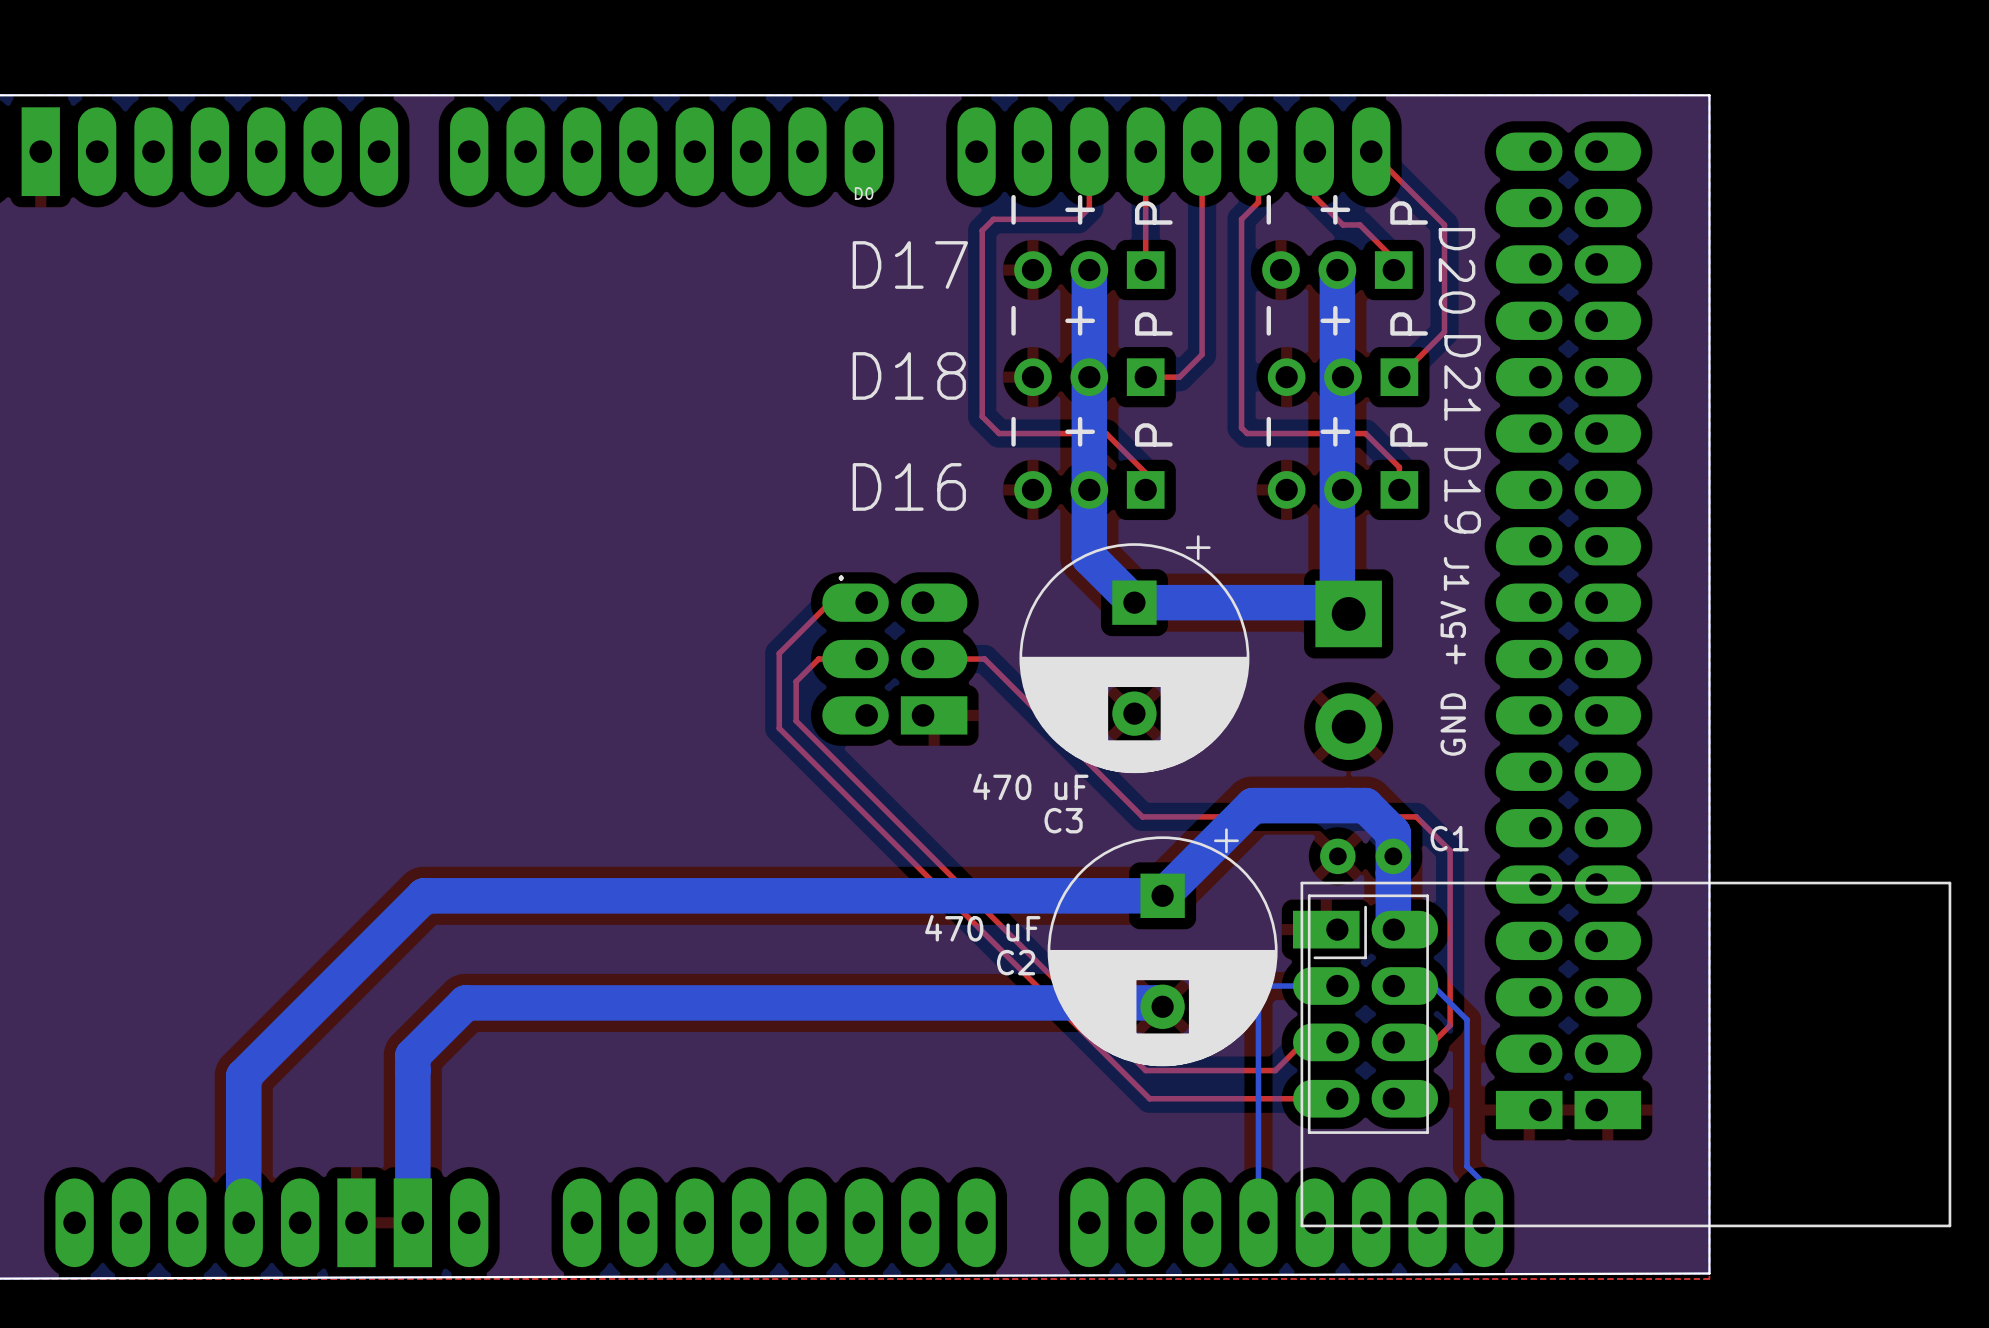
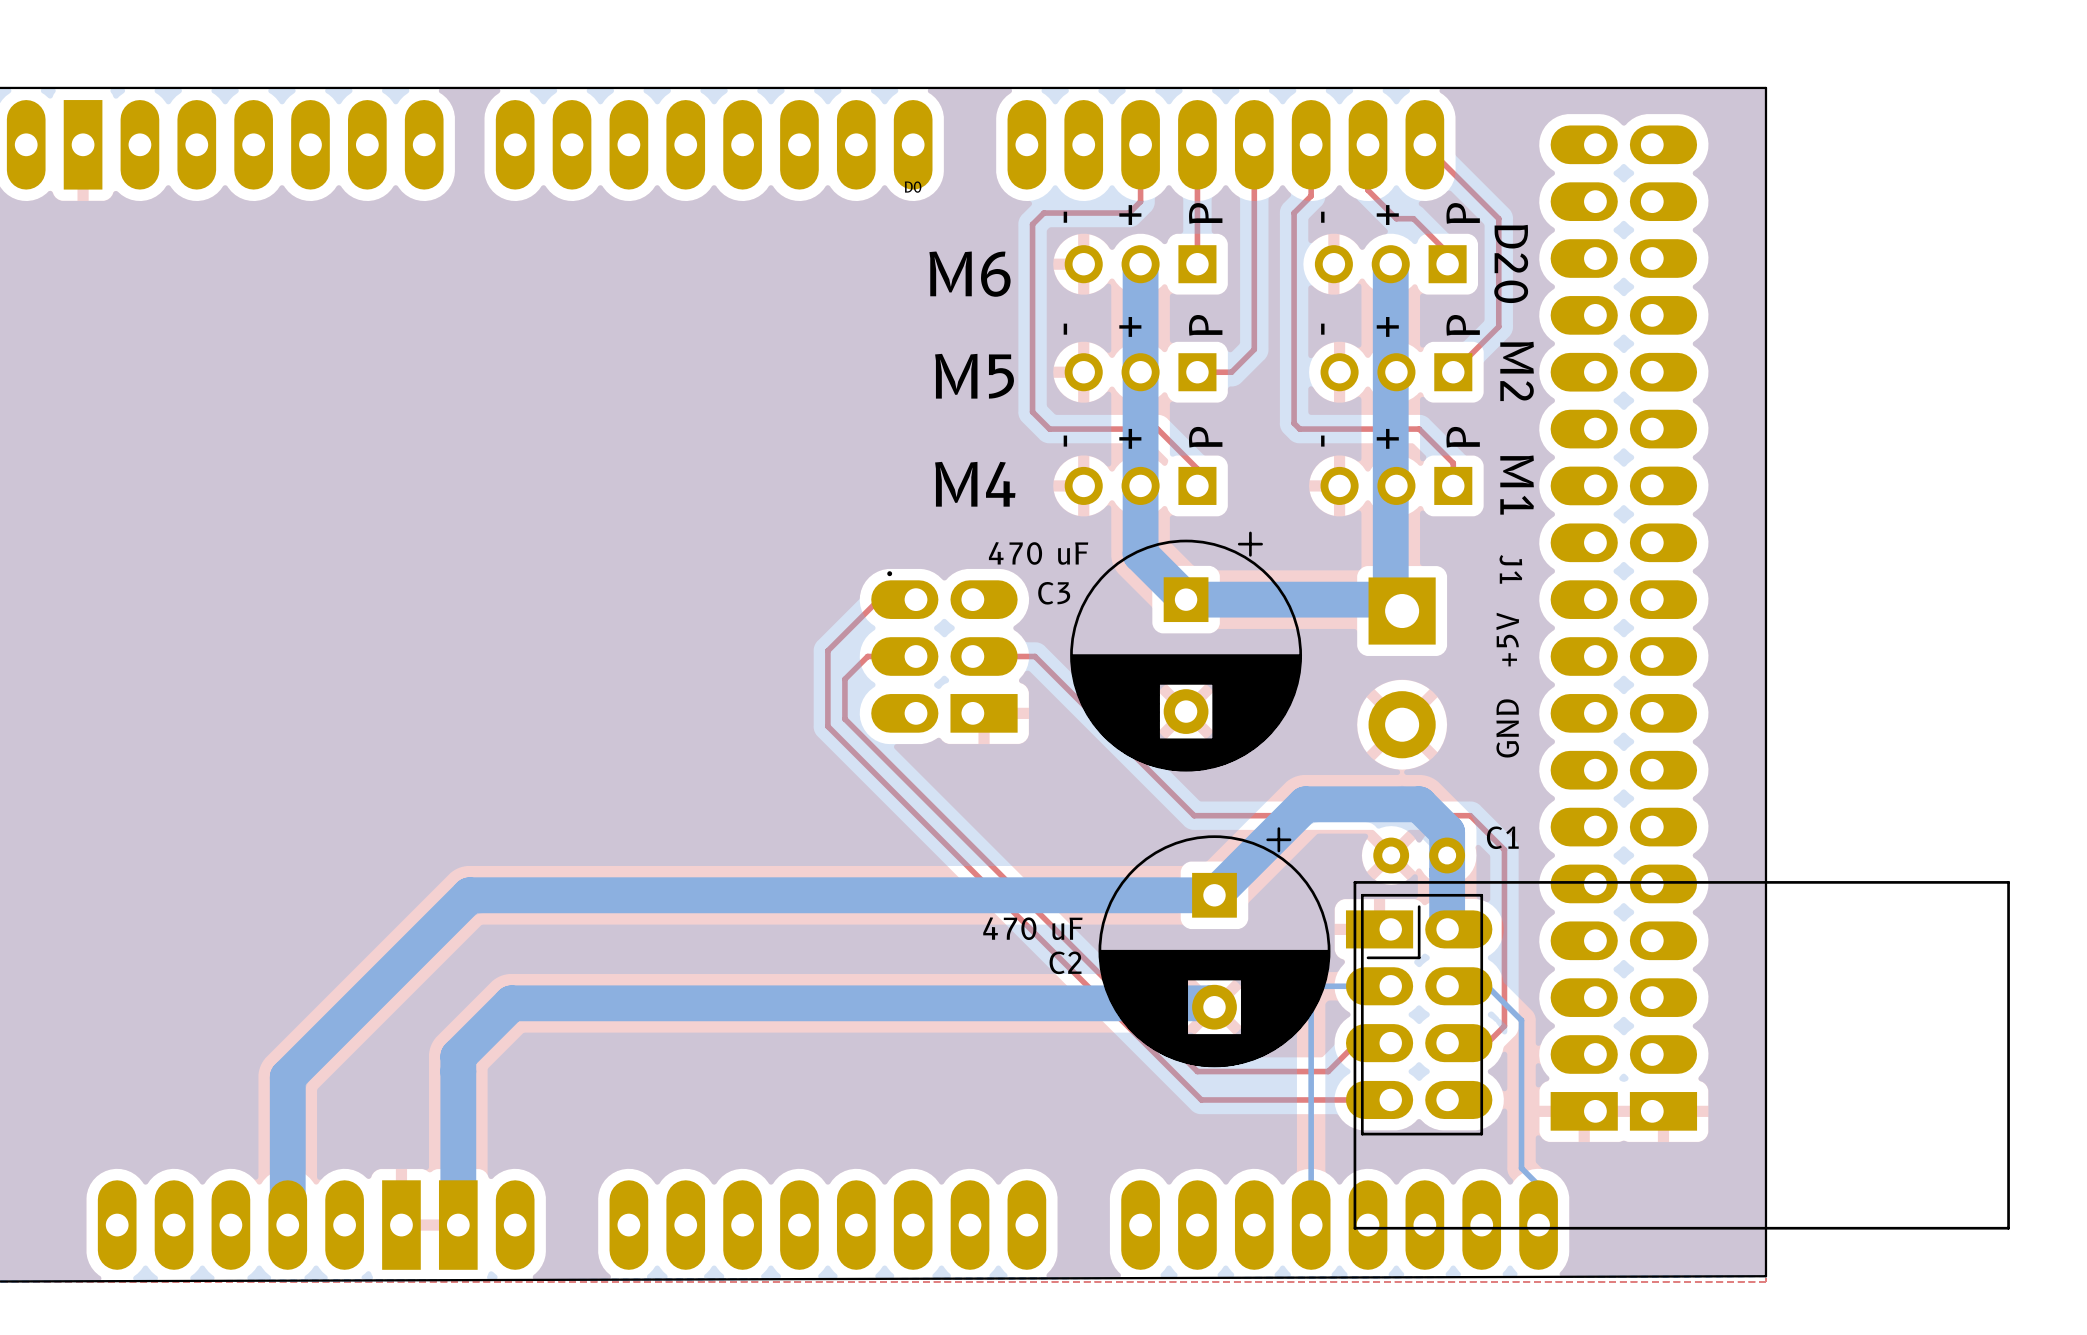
D17 name: D17 (910, 264) -> M6 (970, 274)
D18 name: D18 (909, 375) -> M5 (974, 376)
D21 name: D21 (1462, 377) -> M2 (1517, 371)
D16 name: D16 (909, 486) -> M4 (975, 484)
D19 name: D19 (1462, 490) -> M1 (1517, 485)
C3 value position: 470 uF (1030, 786) -> 470 uF (1038, 553)
C3 name position: C3 (1063, 820) -> C3 (1054, 593)

